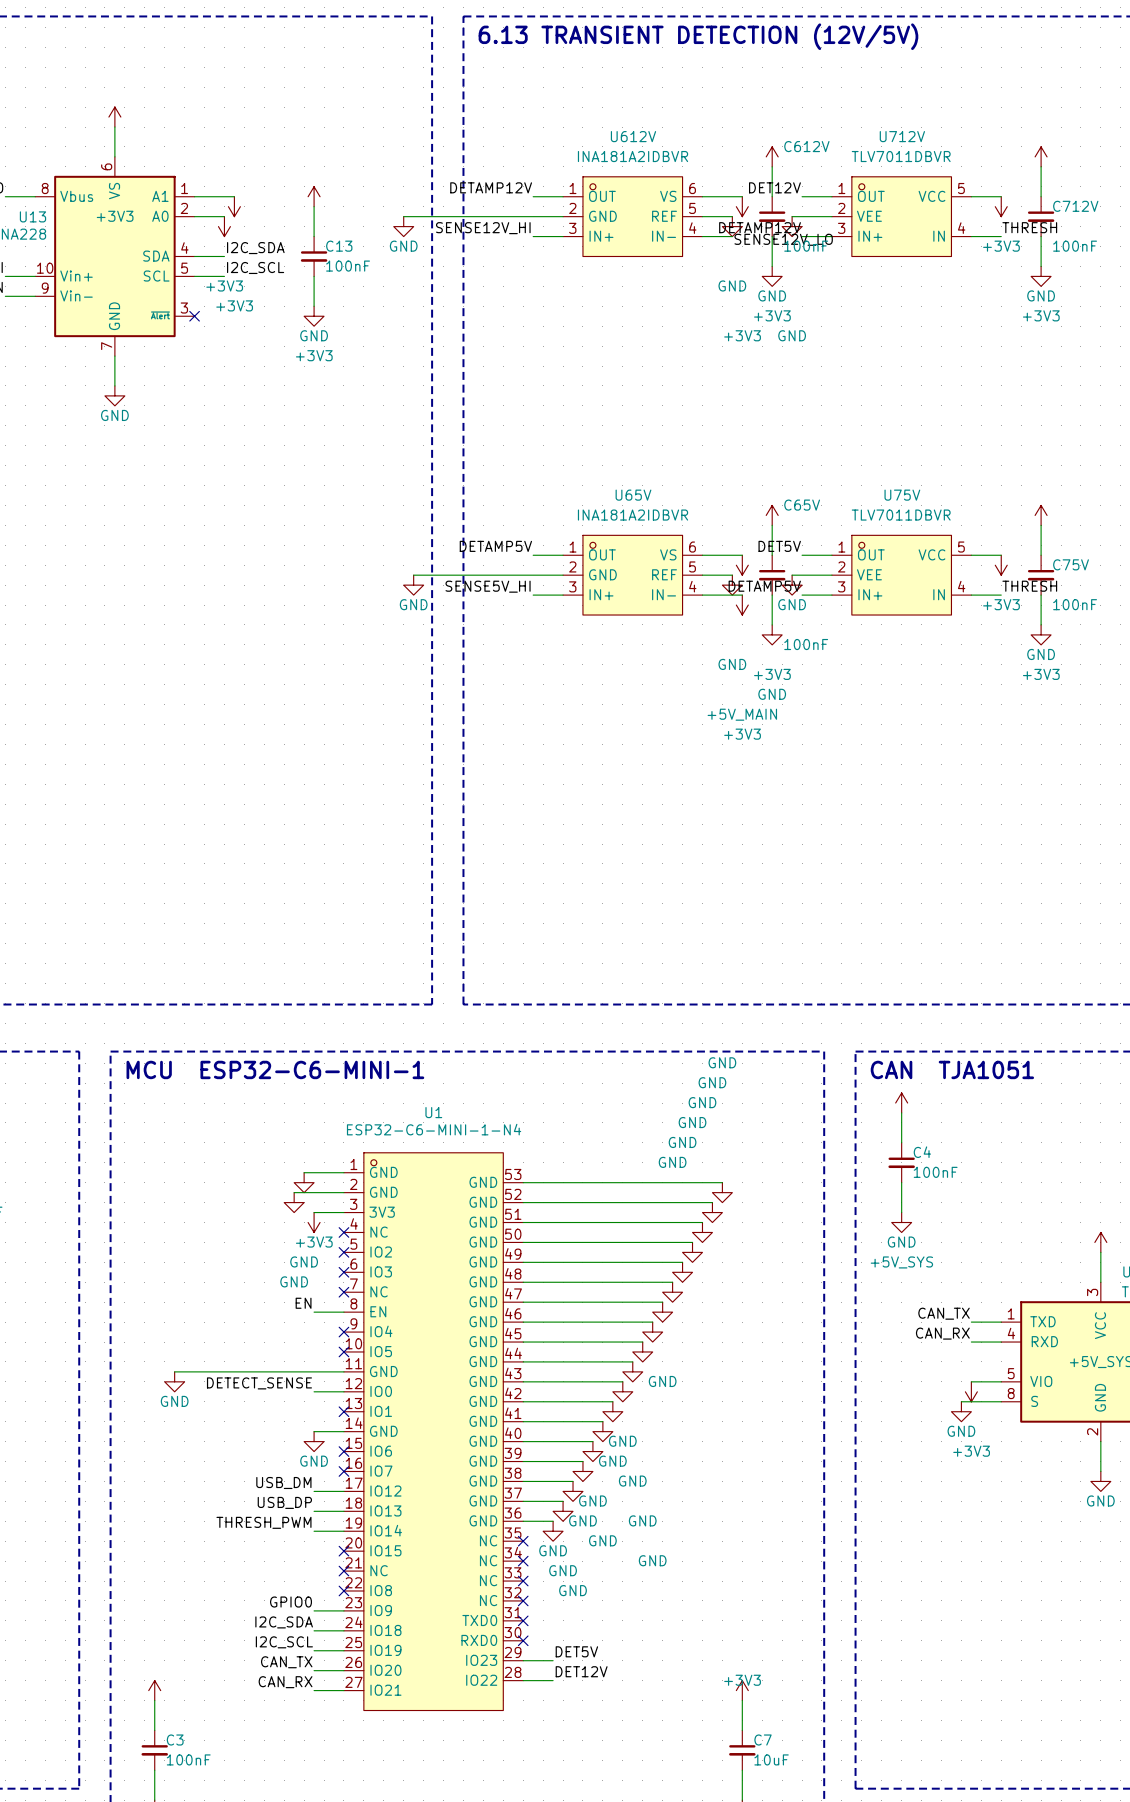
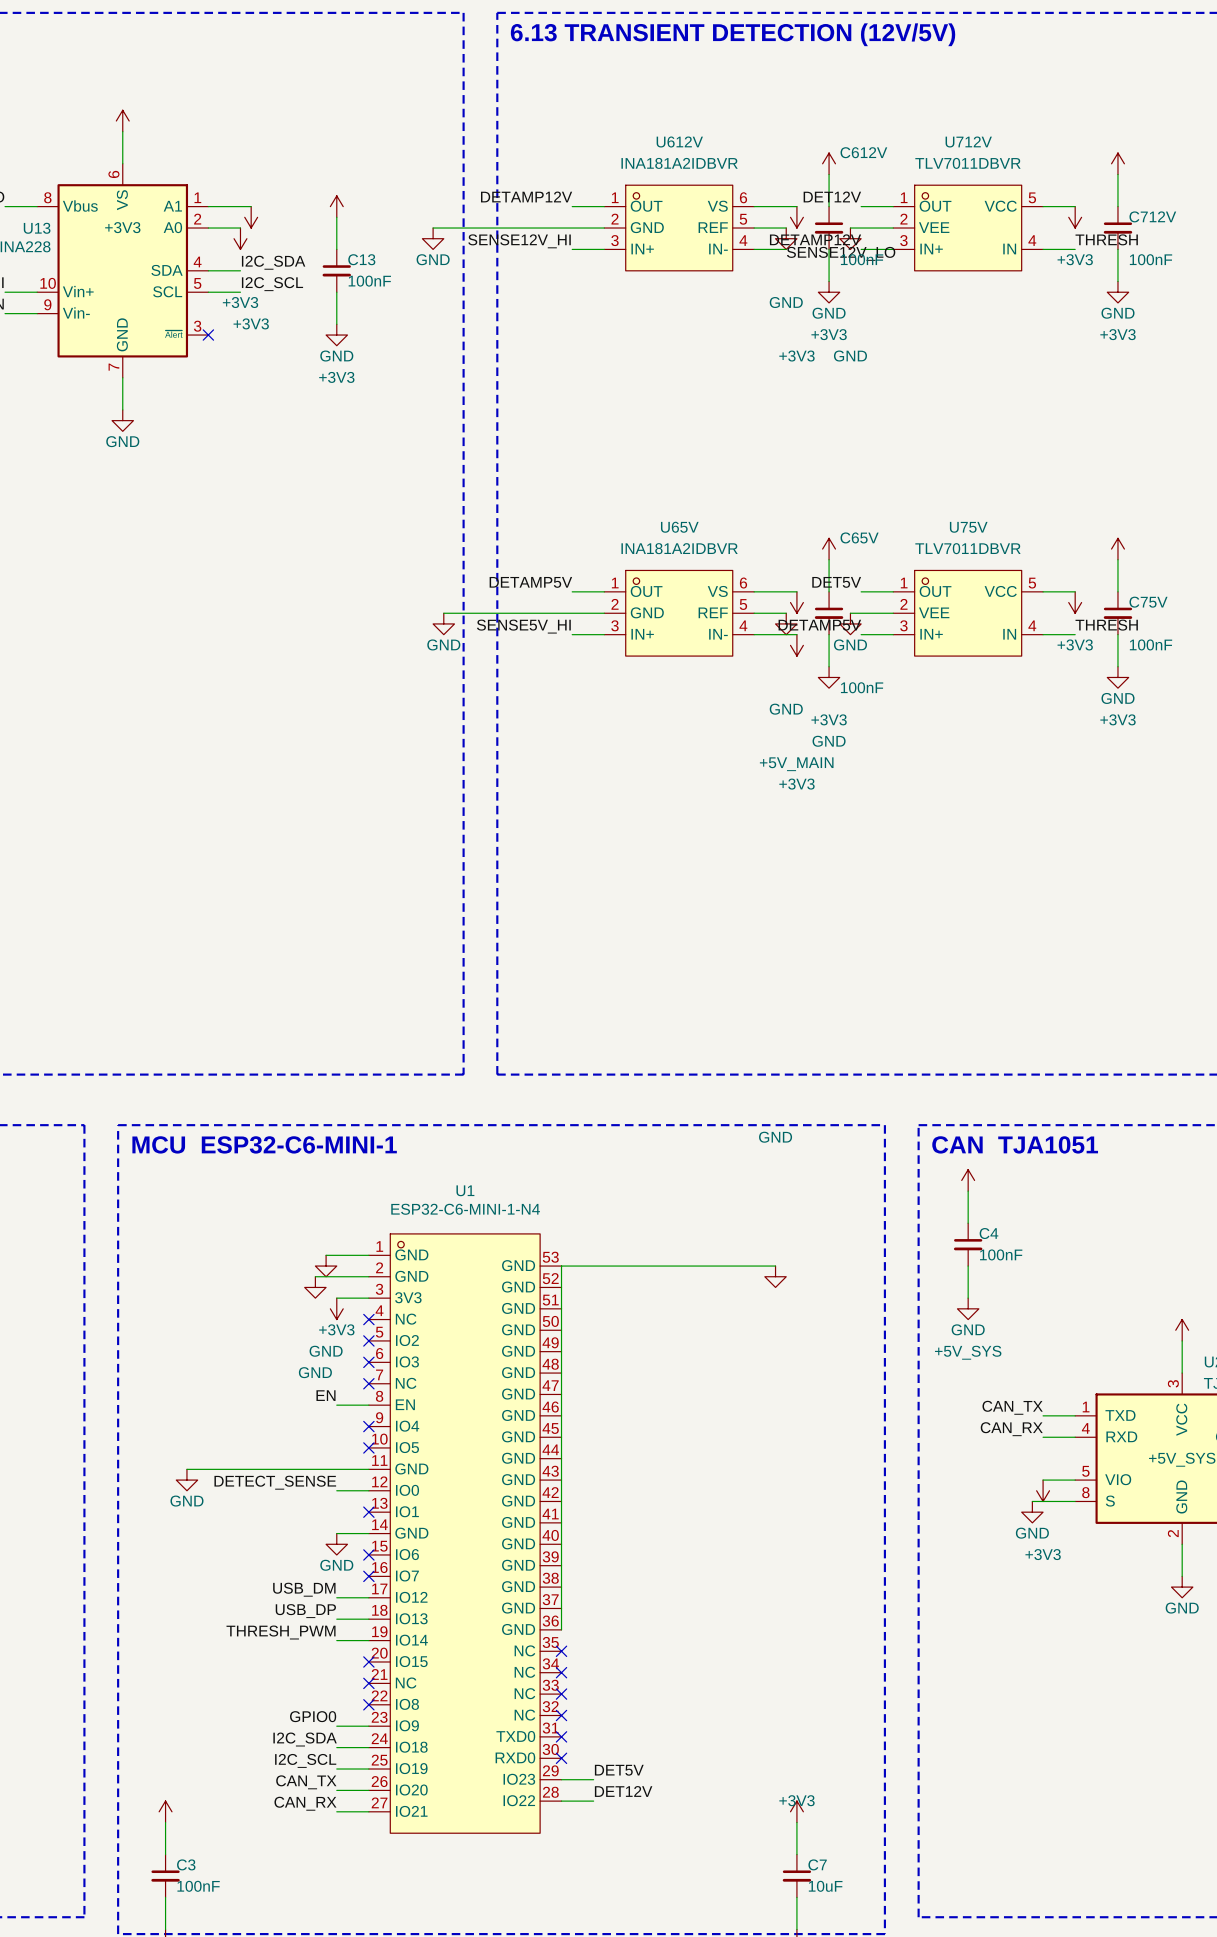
wire: (523, 1202) (712, 1202) -> none
power symbol: GND (712, 1212) -> none
wire: (523, 1222) (702, 1222) -> none
power symbol: GND (702, 1232) -> none
wire: (523, 1242) (692, 1242) -> none
power symbol: GND (692, 1252) -> none
wire: (523, 1262) (682, 1262) -> none
power symbol: GND (682, 1272) -> none
wire: (523, 1282) (672, 1282) -> none
power symbol: GND (672, 1292) -> none
wire: (523, 1302) (662, 1302) -> none
power symbol: GND (662, 1312) -> none
wire: (523, 1322) (652, 1322) -> none
power symbol: GND (652, 1332) -> none
wire: (523, 1342) (642, 1342) -> none
power symbol: GND (642, 1351) -> none
wire: (523, 1361) (632, 1361) -> none
power symbol: GND (632, 1371) -> none
wire: (523, 1381) (622, 1381) -> none
power symbol: GND (622, 1391) -> none
wire: (523, 1401) (612, 1401) -> none
power symbol: GND (612, 1411) -> none
wire: (523, 1421) (602, 1421) -> none
power symbol: GND (602, 1431) -> none
wire: (523, 1441) (592, 1441) -> none
power symbol: GND (592, 1451) -> none
wire: (523, 1461) (582, 1461) -> none
power symbol: GND (582, 1471) -> none
wire: (523, 1481) (573, 1481) -> none
power symbol: GND (573, 1491) -> none
wire: (523, 1501) (563, 1501) -> none
power symbol: GND (563, 1511) -> none
wire: (523, 1521) (553, 1521) -> (561, 1629) (561, 1266)
power symbol: GND (553, 1531) -> none

